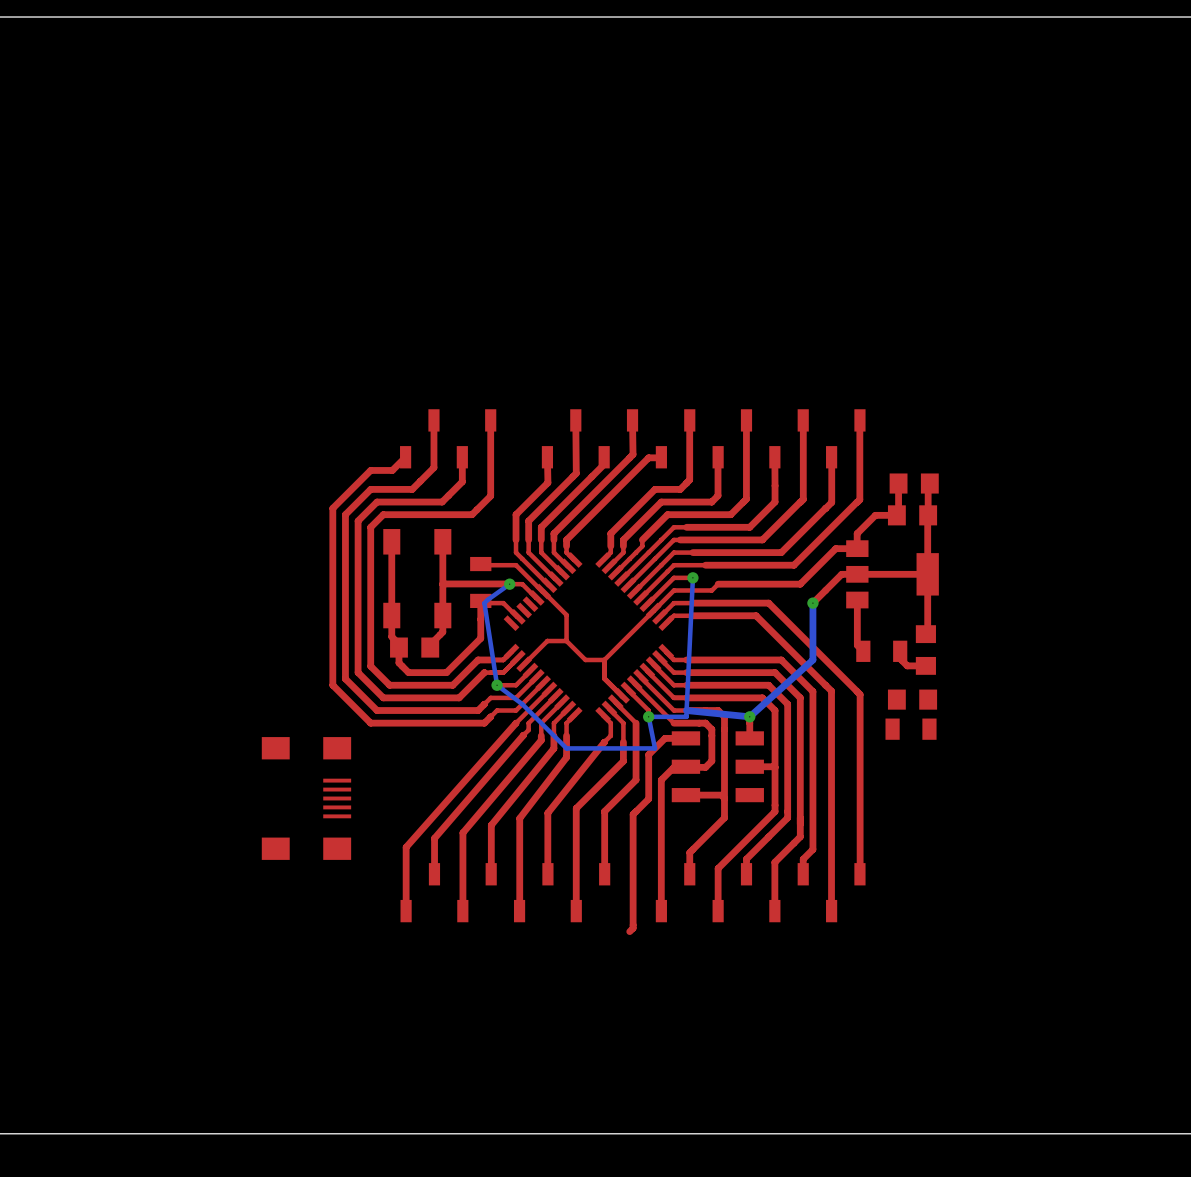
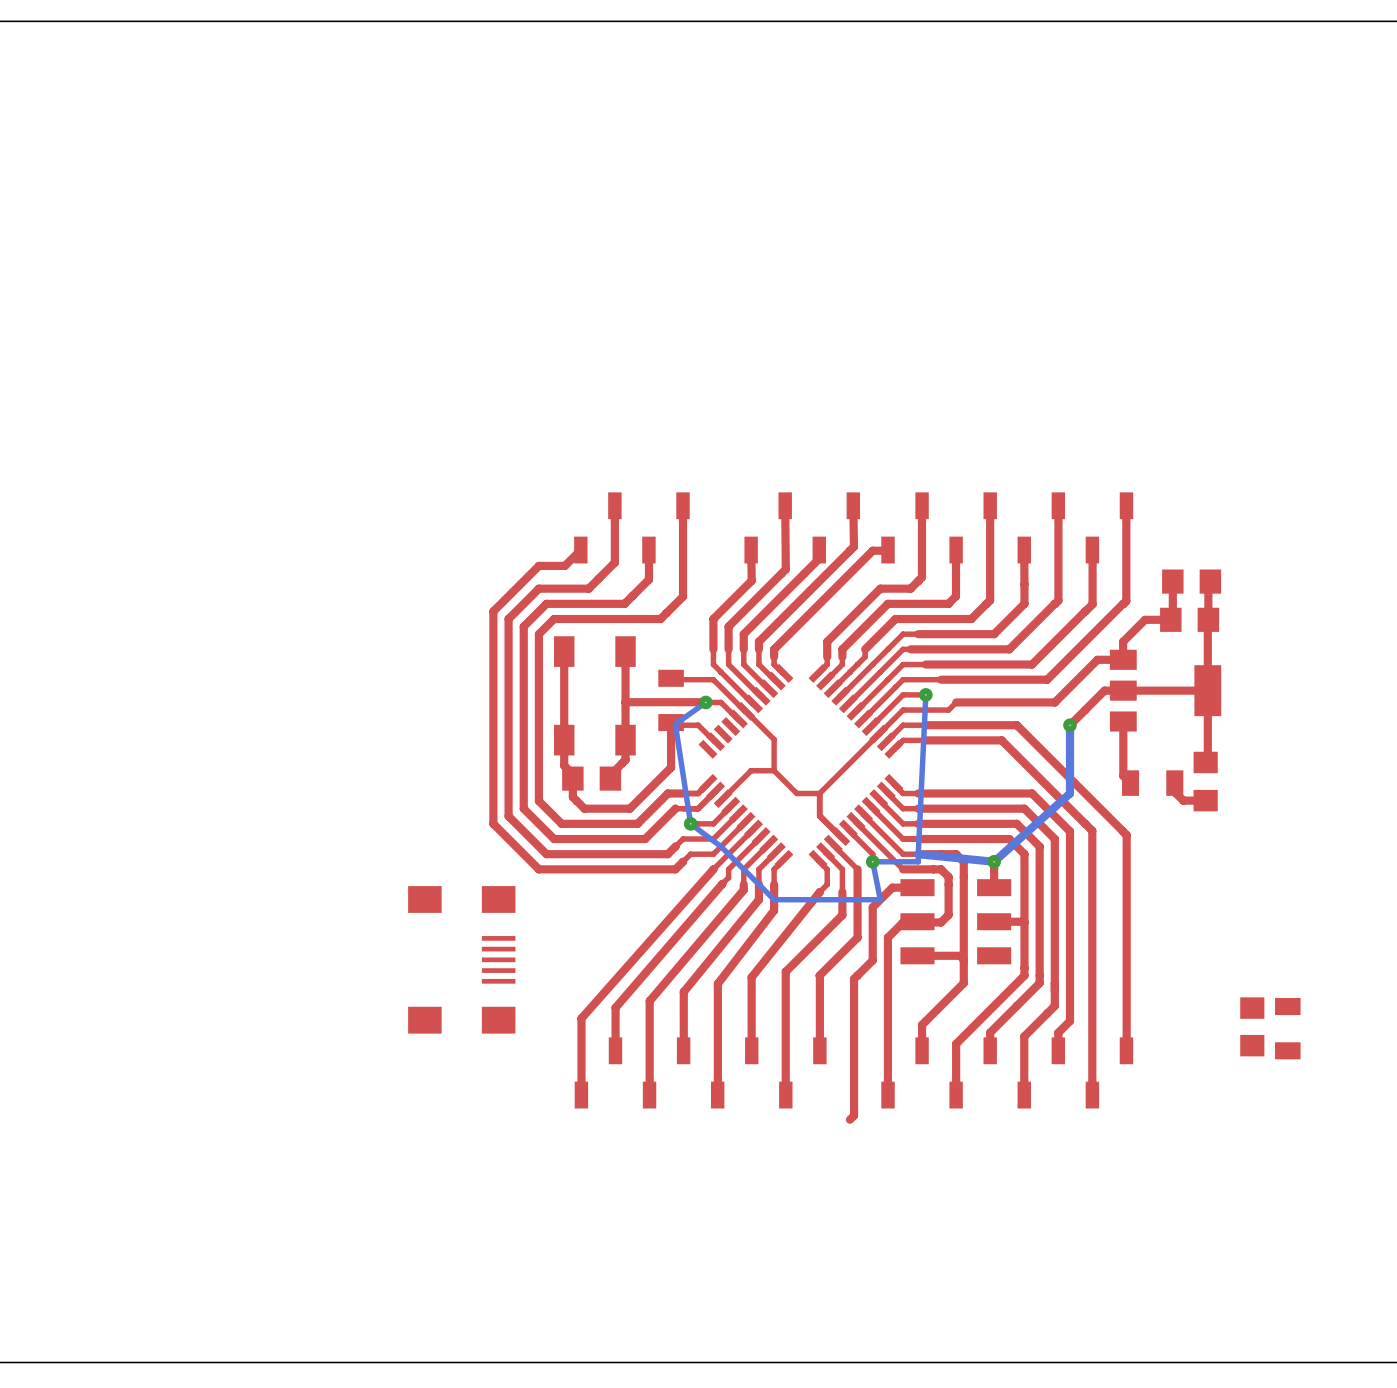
part rotation: 0° (912, 699) -> 90° clockwise (1252, 1026)
part position: (912, 699) -> (1252, 1026)
part rotation: 0° (911, 729) -> 90° clockwise (1287, 1028)
part position: (911, 729) -> (1287, 1028)

